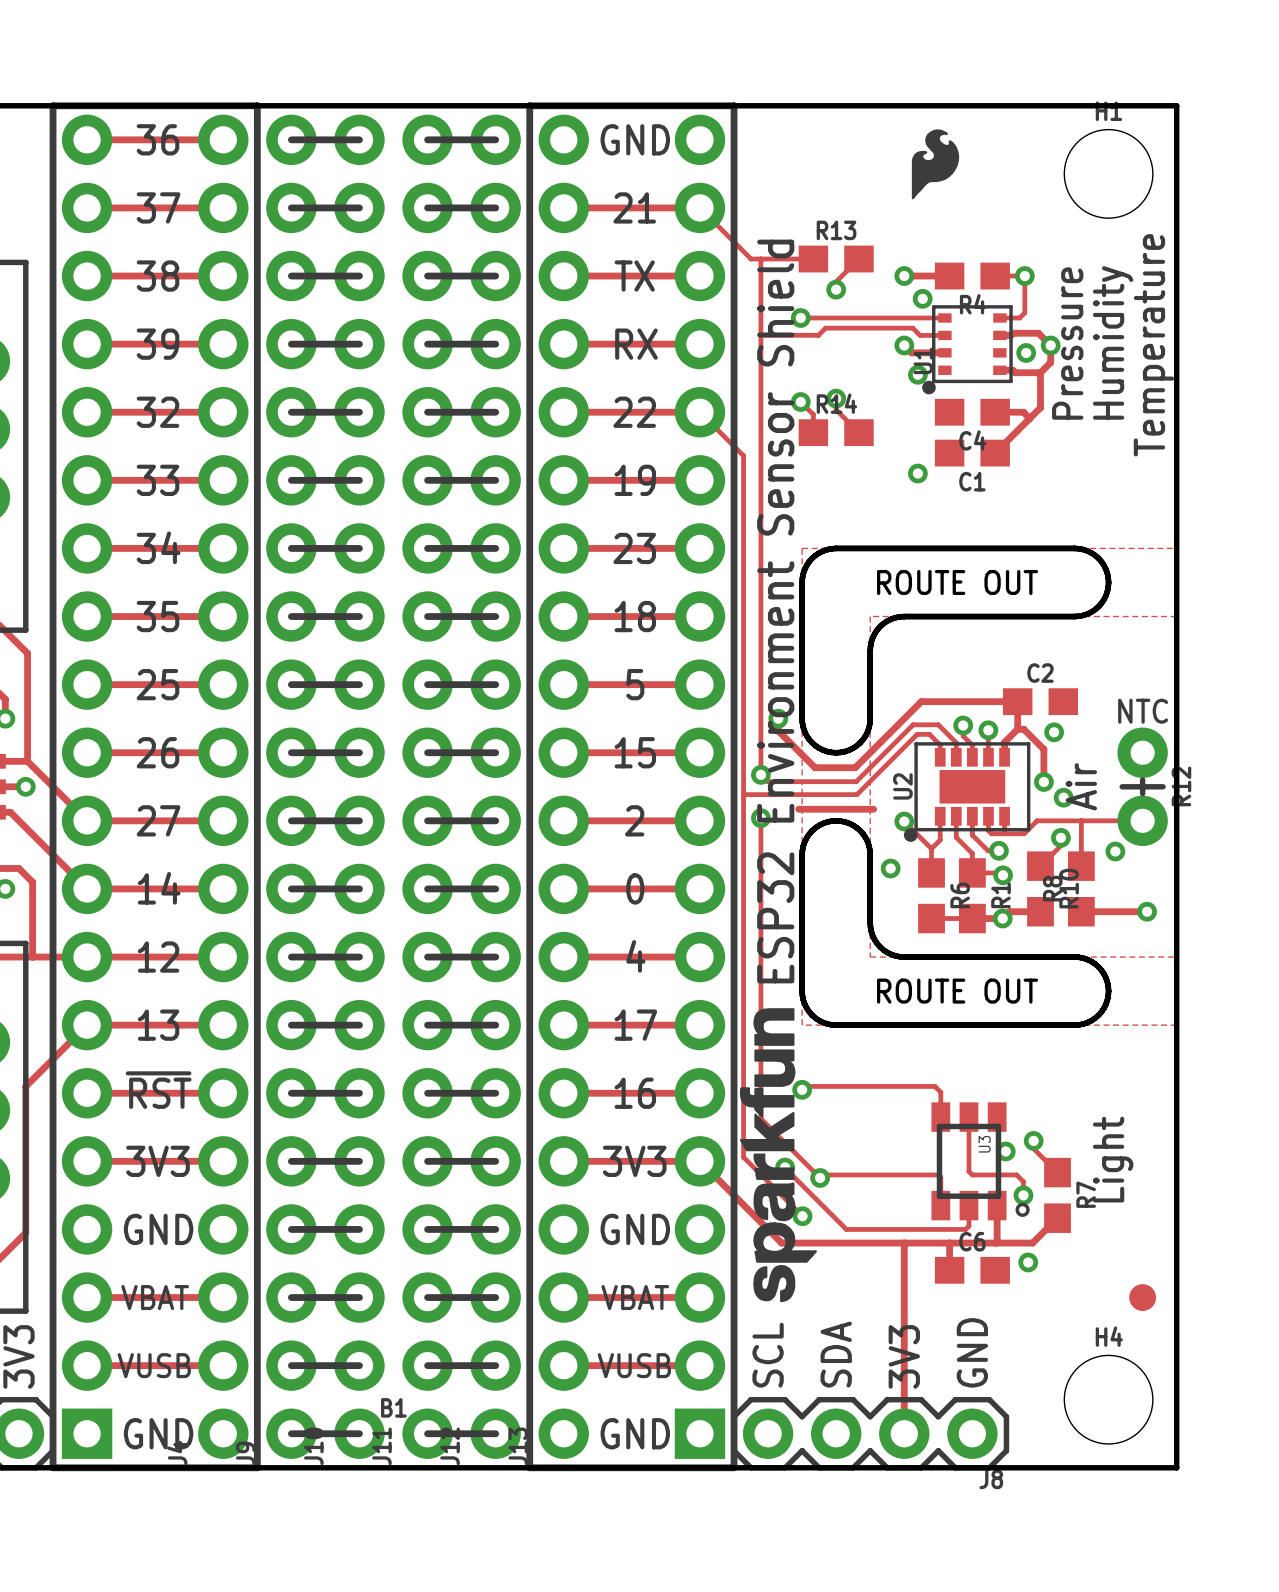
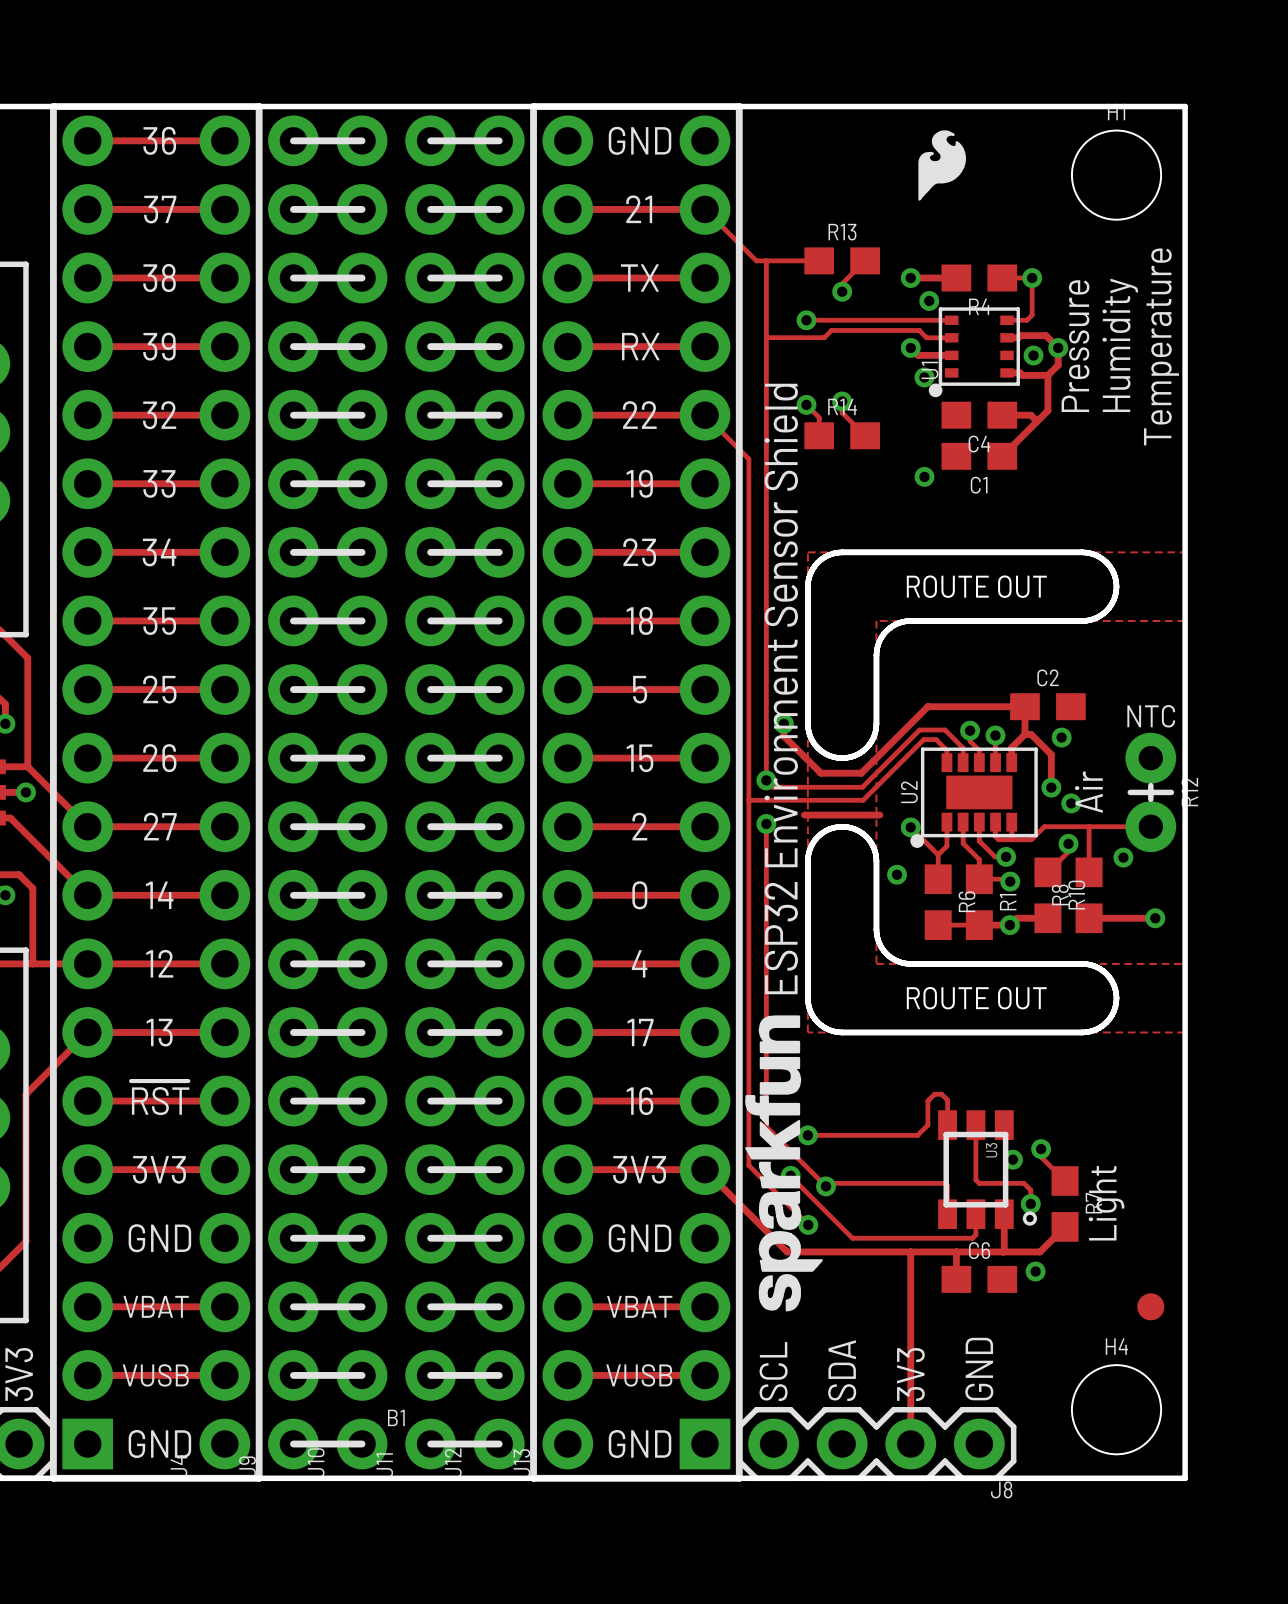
track: (928, 1086) (805, 1086) (802, 1089) -> (934, 1094) (927, 1101) (927, 1125) (917, 1135) (807, 1135)
via position: (802, 1089) -> (807, 1135)
text position: Light (1113, 1159) -> Light (1106, 1203)

